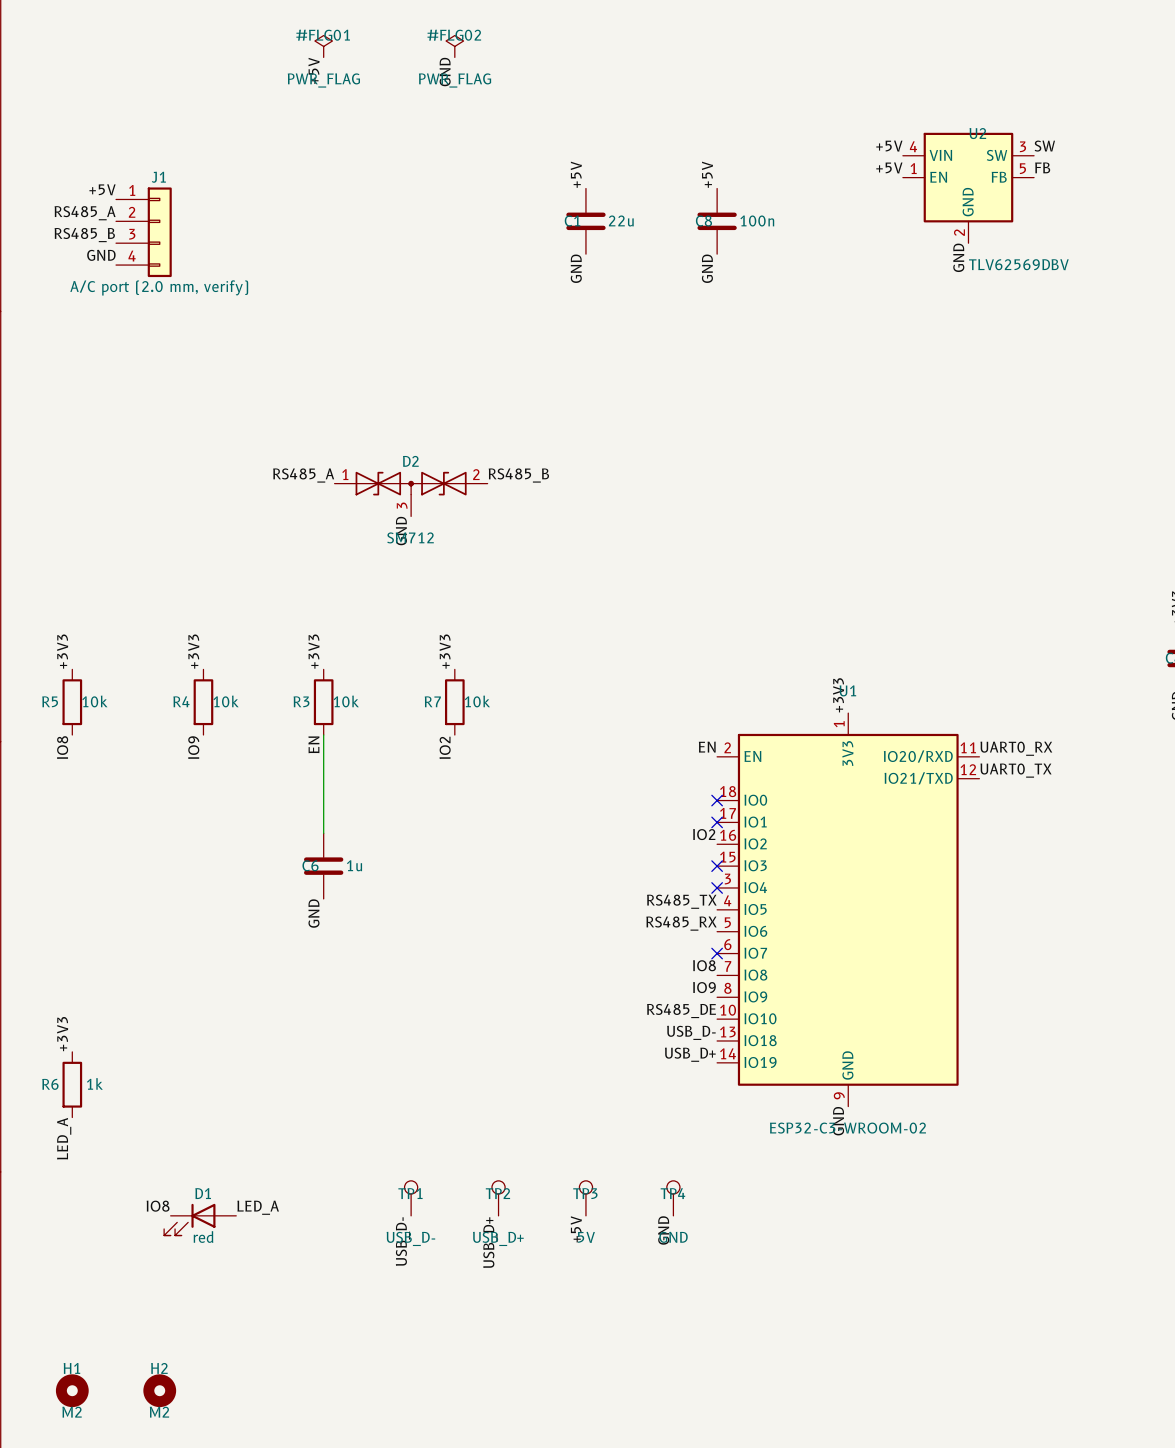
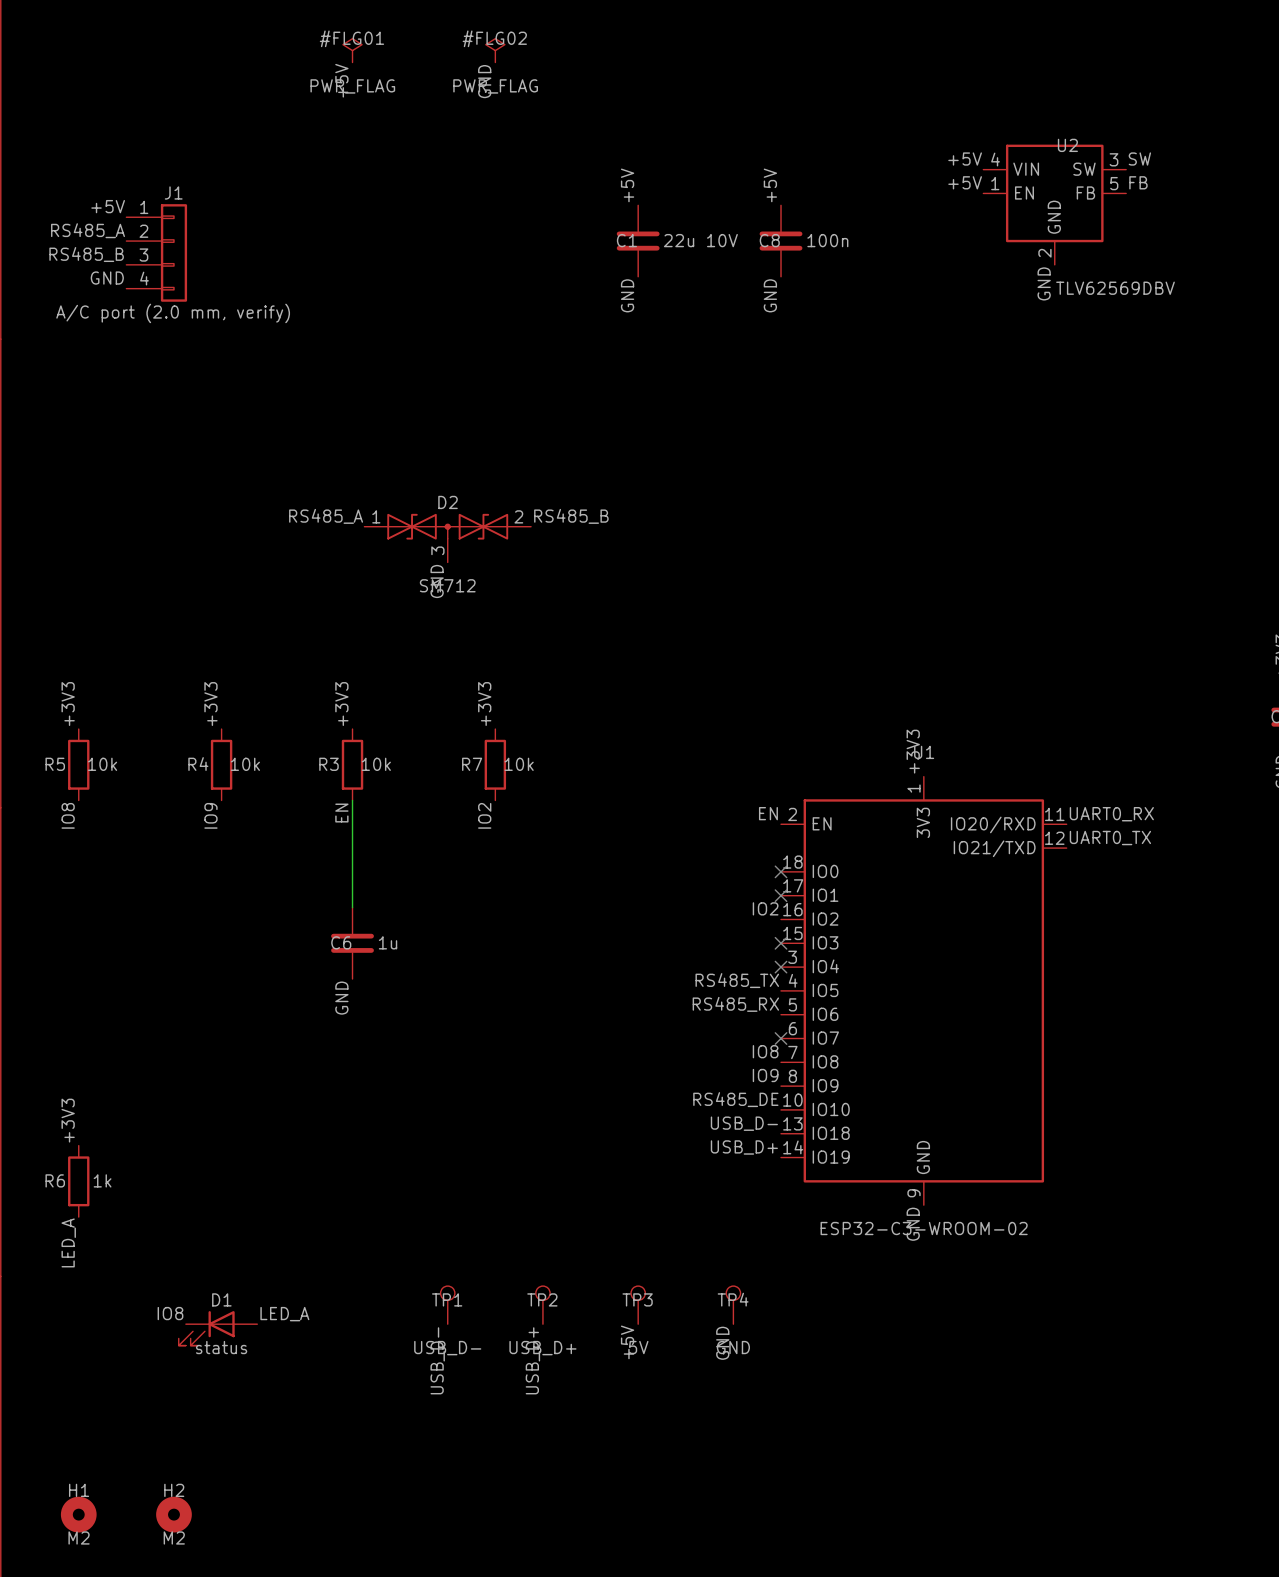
C1 value: 22u (621, 220) -> 22u 10V (700, 240)
D1 value: red (203, 1237) -> status (221, 1347)

